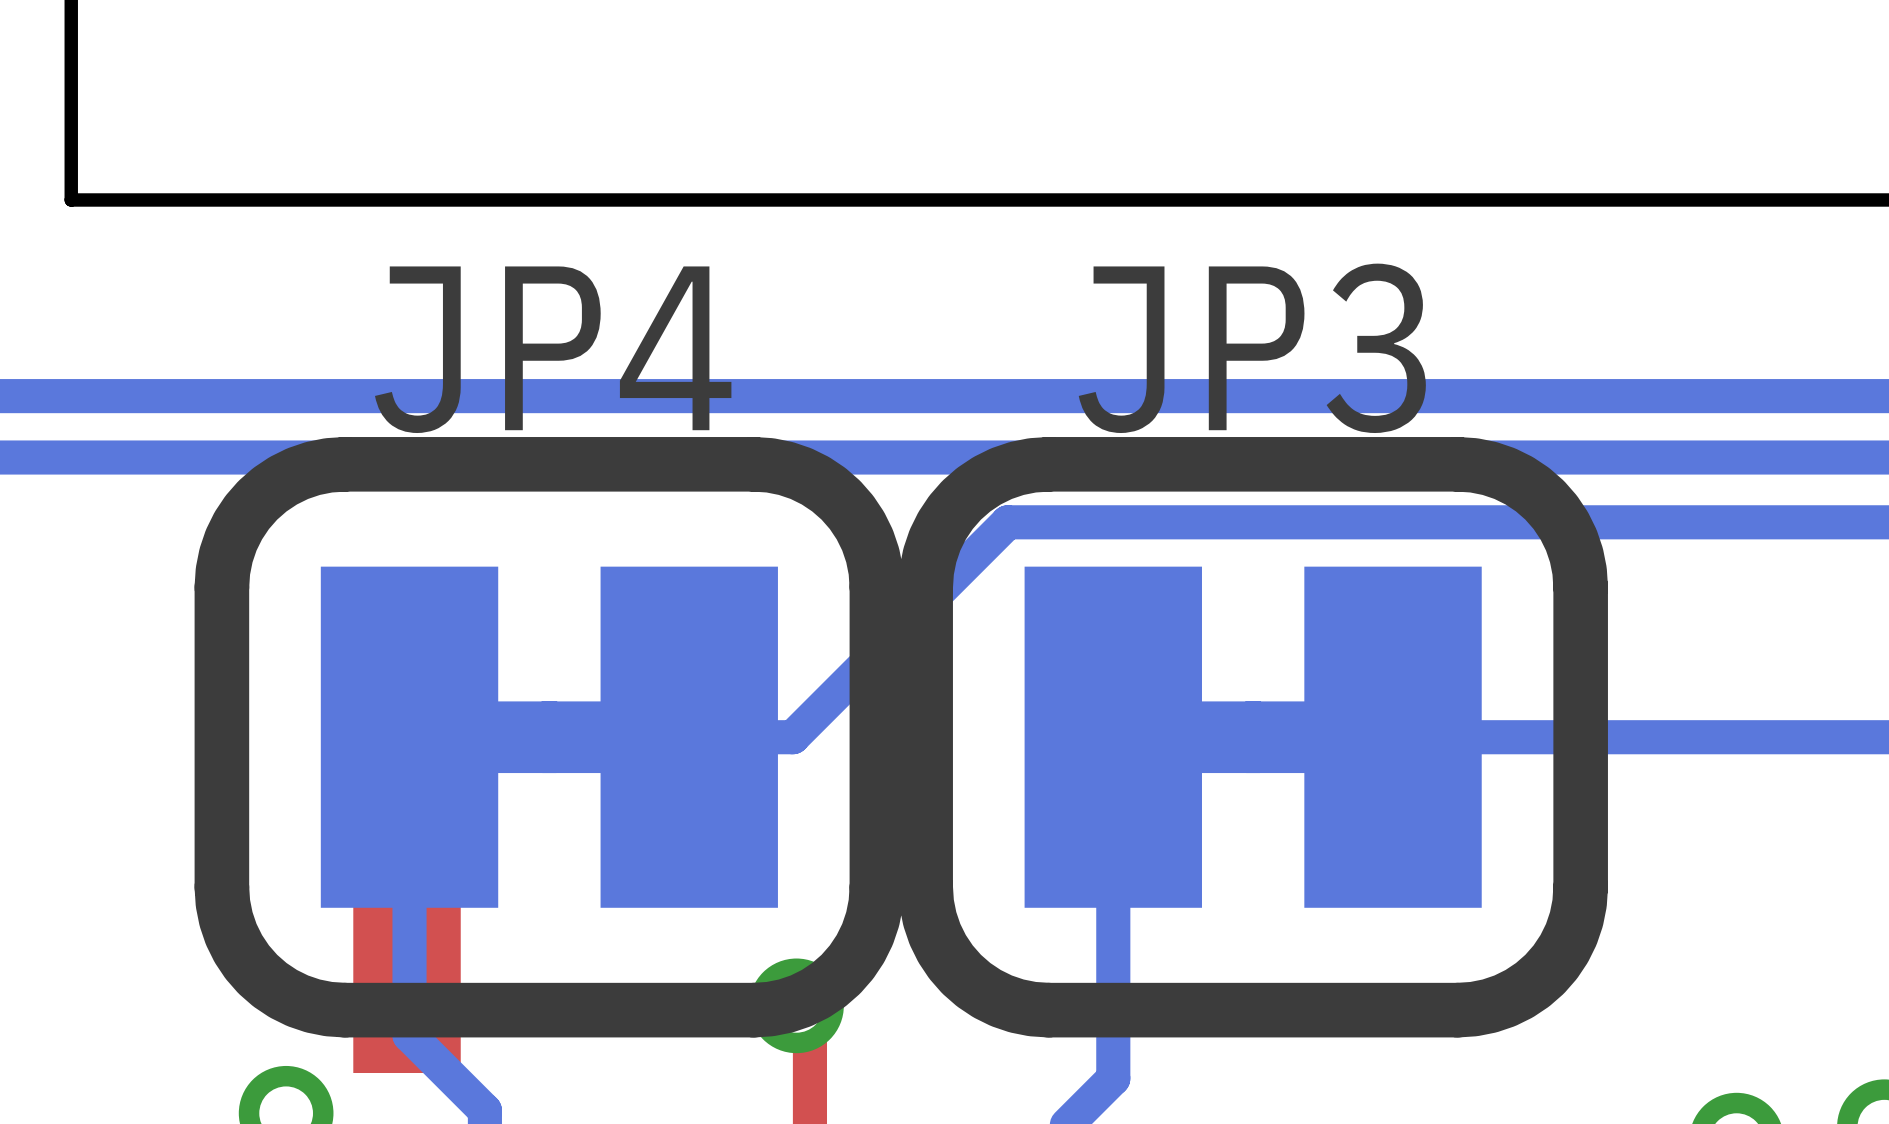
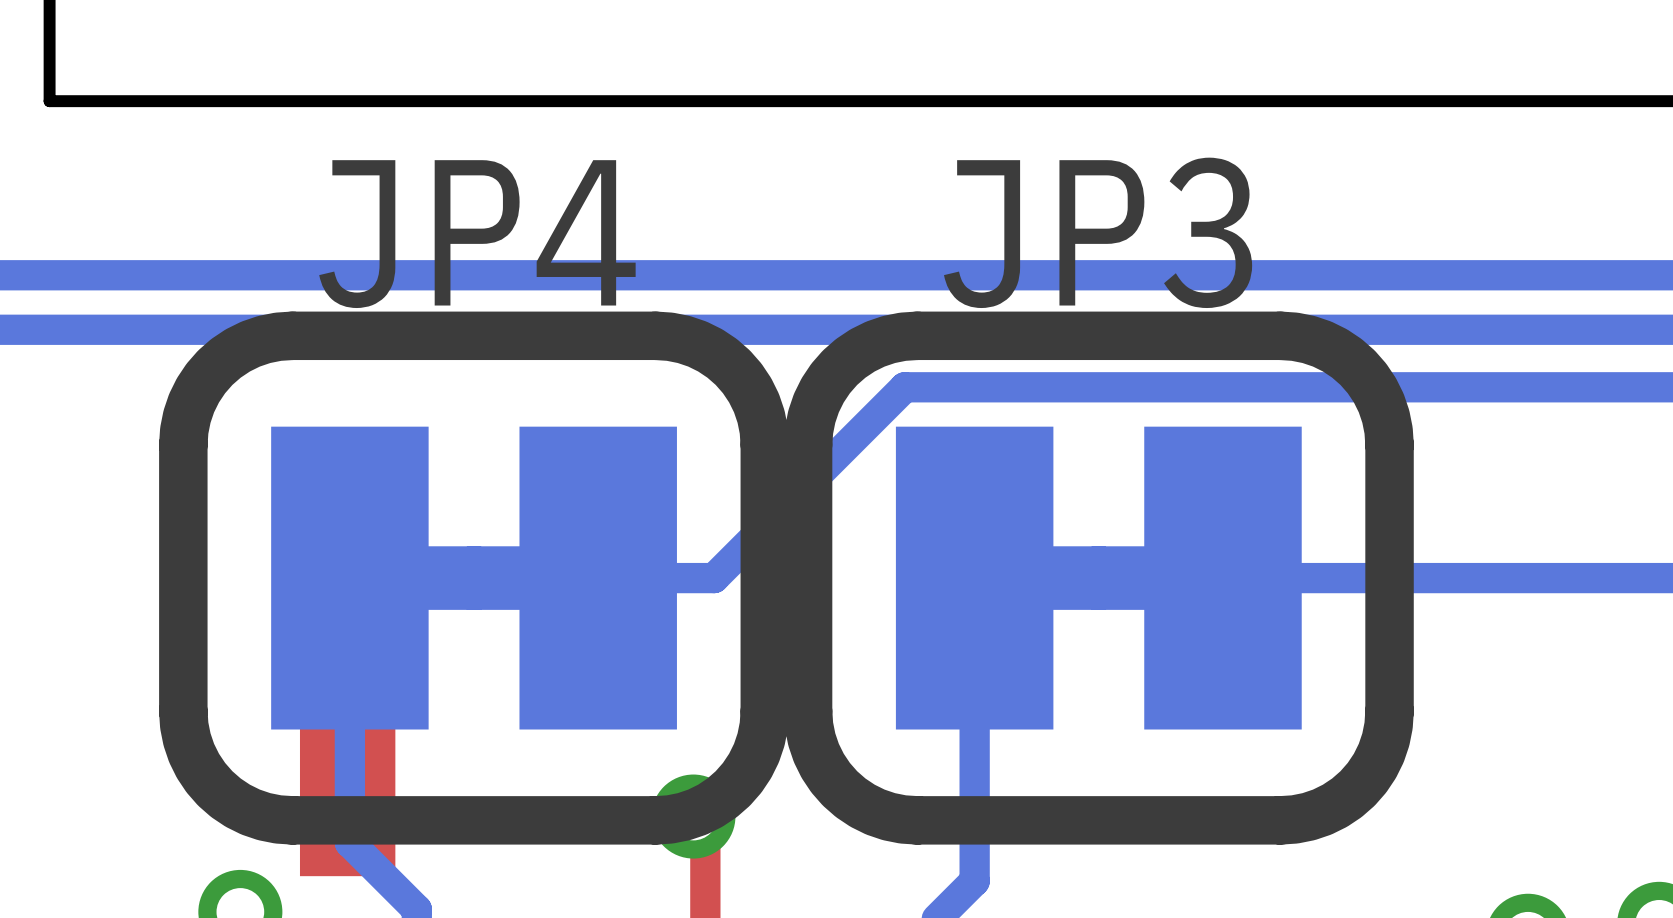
bottom track: (1034, 522) (1007, 522) (792, 737) -> (904, 387) (714, 578) (690, 578)

